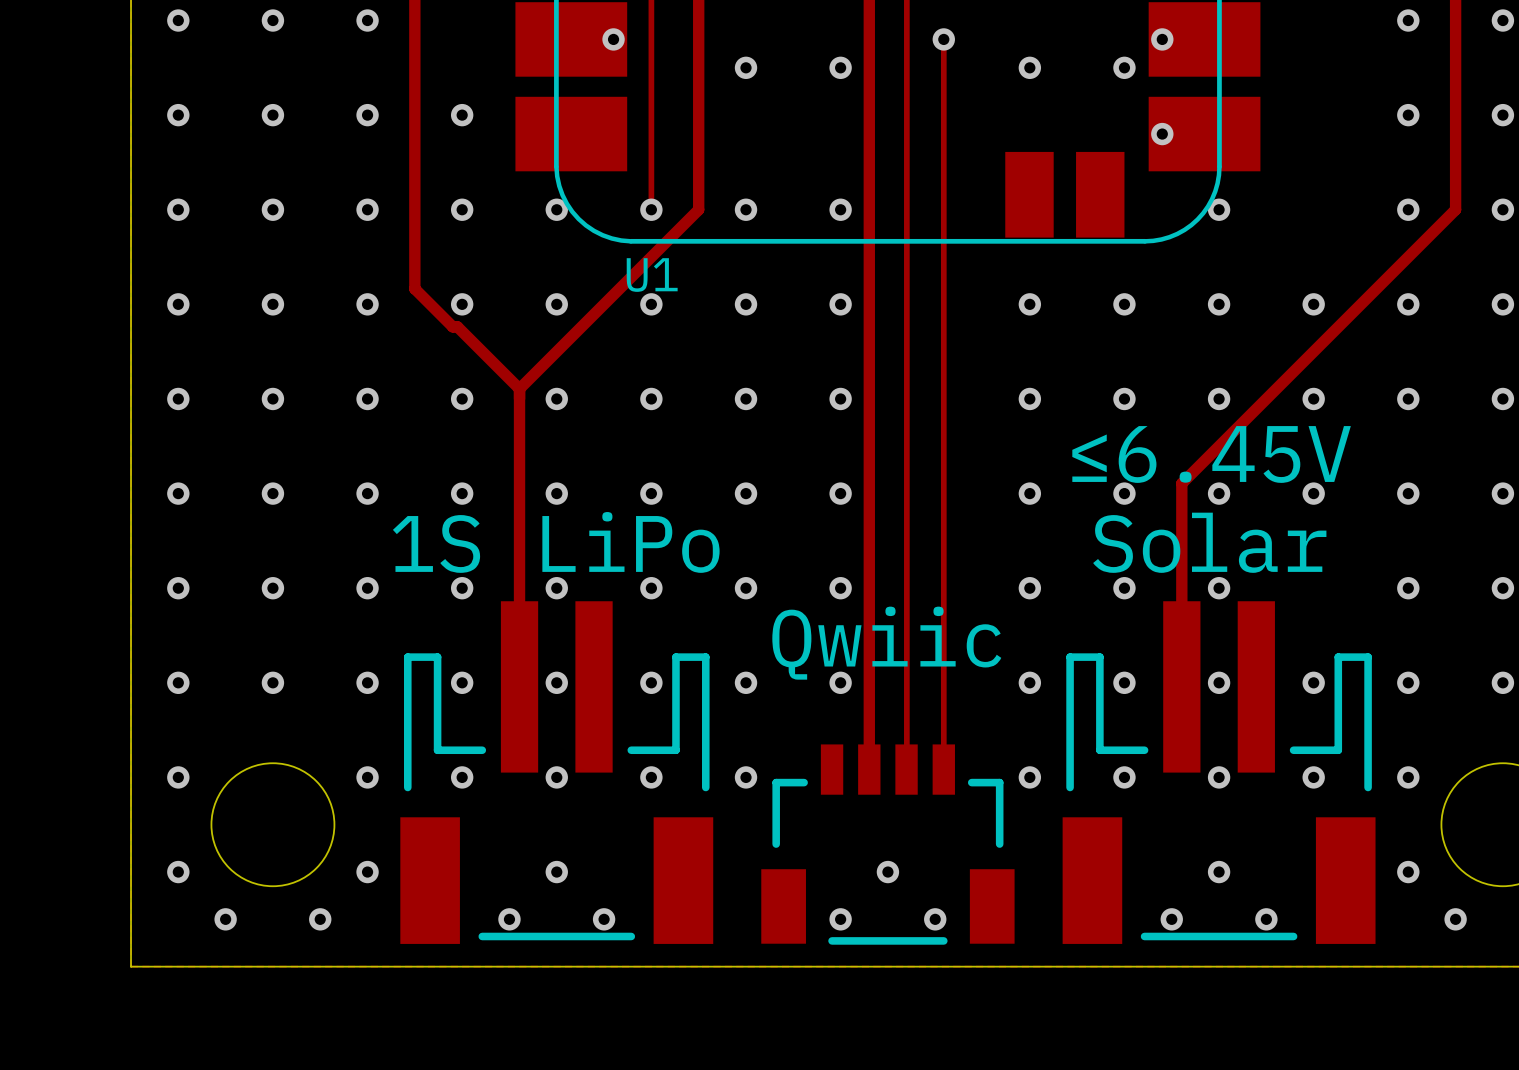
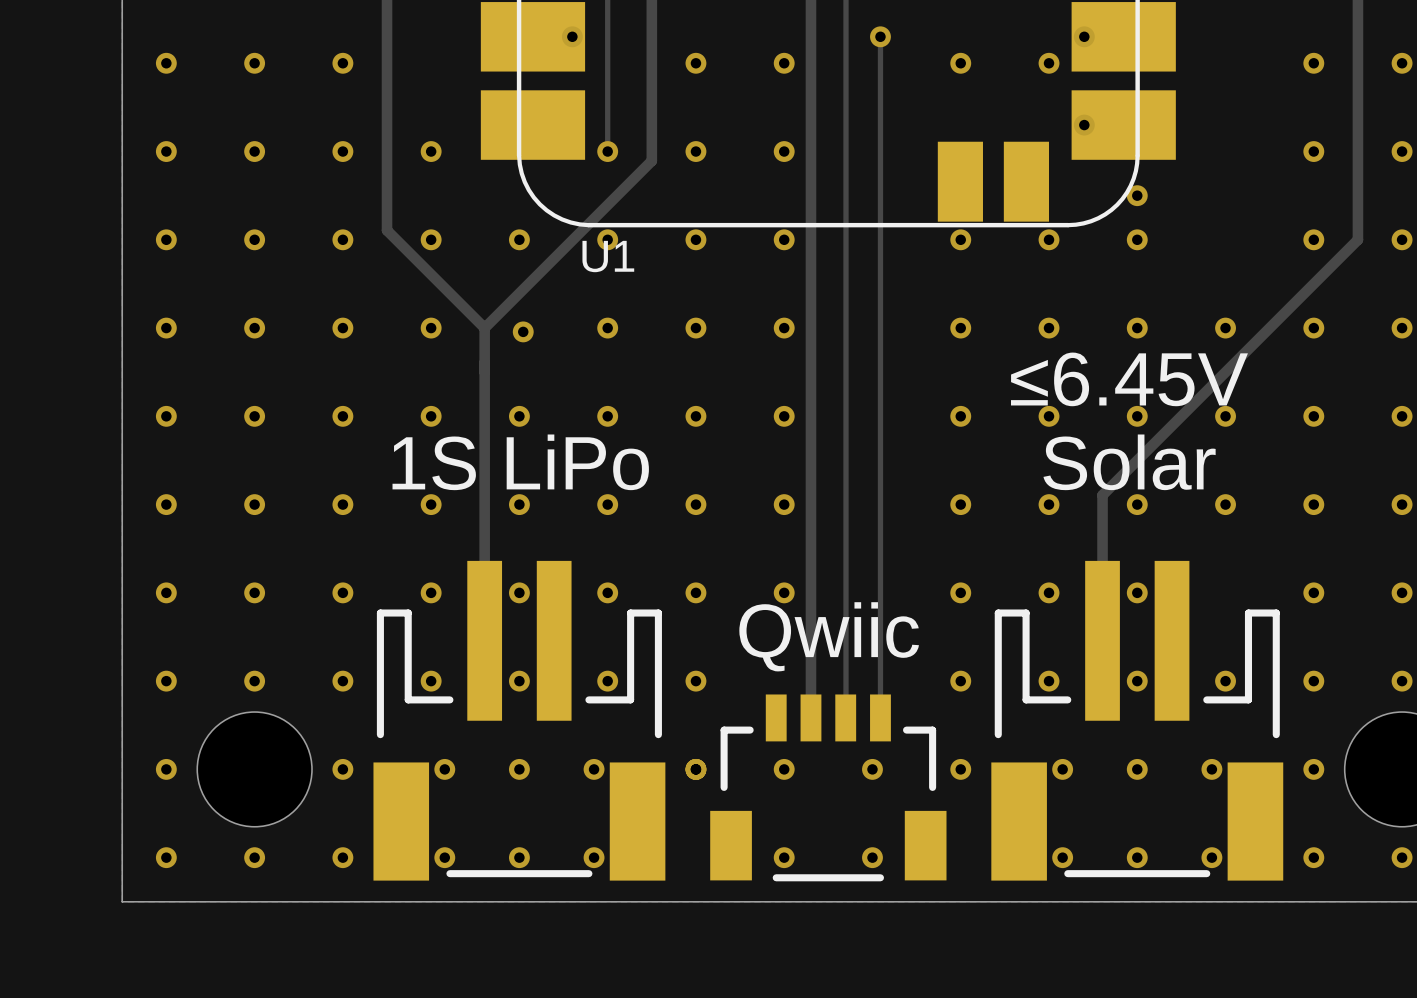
via: (178, 20) -> none
via: (272, 20) -> none
via: (367, 20) -> none
via: (1408, 20) -> none
via: (1502, 20) -> none
via: none -> (166, 63)
via: none -> (254, 63)
via: none -> (342, 63)
via: none -> (1313, 63)
via: none -> (1402, 63)
via: (178, 115) -> none
via: (272, 115) -> none
via: (367, 115) -> none
via: (462, 115) -> none
via: (1408, 115) -> none
via: (1502, 115) -> none
via: none -> (166, 151)
via: none -> (254, 151)
via: none -> (342, 151)
via: none -> (431, 151)
track: (651, 162) (651, 209) -> none
via: none -> (607, 151)
via: none -> (695, 151)
via: none -> (784, 151)
via: none -> (1313, 151)
via: none -> (1402, 151)
track: (698, 172) (698, 209) (519, 388) (457, 326) (452, 326) (414, 288) (414, 246) -> (651, 160) (484, 328)
via: (178, 209) -> none
via: (272, 209) -> none
via: (367, 209) -> none
via: (462, 209) -> none
via: (556, 209) -> none
via: (651, 209) -> none
via: (746, 209) -> none
via: (840, 209) -> none
via: (1408, 209) -> none
track: (1455, 209) (1181, 483) (1181, 530) -> (1357, 195) (1357, 239) (1102, 495)
via: (1502, 209) -> none
track: none -> (387, 230) (484, 328)
via: none -> (166, 239)
via: none -> (254, 239)
via: none -> (342, 239)
via: none -> (431, 239)
via: none -> (519, 239)
via: none -> (607, 239)
via: none -> (695, 239)
via: none -> (784, 239)
via: none -> (960, 239)
via: none -> (1049, 239)
via: none -> (1137, 239)
via: none -> (1313, 239)
via: none -> (1402, 239)
via: (178, 304) -> none
via: (272, 304) -> none
via: (367, 304) -> none
via: (462, 304) -> none
via: (556, 304) -> none
via: (651, 304) -> none
via: (746, 304) -> none
via: (840, 304) -> none
via: (1029, 304) -> none
via: (1124, 304) -> none
via: (1219, 304) -> none
via: (1313, 304) -> none
via: (1408, 304) -> none
via: (1502, 304) -> none
via: none -> (166, 328)
via: none -> (254, 328)
via: none -> (342, 328)
via: none -> (431, 328)
track: none -> (484, 328) (484, 362)
via: none -> (607, 328)
via: none -> (695, 328)
via: none -> (784, 328)
via: none -> (960, 328)
via: none -> (1049, 328)
via: none -> (1137, 328)
via: none -> (1225, 328)
via: none -> (1313, 328)
via: none -> (1402, 328)
via: none -> (523, 331)
via: (178, 398) -> none
via: (272, 398) -> none
via: (367, 398) -> none
via: (462, 398) -> none
via: (556, 398) -> none
via: (651, 398) -> none
via: (746, 398) -> none
via: (840, 398) -> none
via: (1029, 398) -> none
via: (1124, 398) -> none
via: (1219, 398) -> none
via: (1313, 398) -> none
via: (1408, 398) -> none
via: (1502, 398) -> none
via: none -> (166, 416)
via: none -> (254, 416)
via: none -> (342, 416)
via: none -> (431, 416)
via: none -> (519, 416)
via: none -> (607, 416)
via: none -> (695, 416)
via: none -> (784, 416)
via: none -> (960, 416)
via: none -> (1049, 416)
via: none -> (1137, 416)
via: none -> (1225, 416)
via: none -> (1313, 416)
via: none -> (1402, 416)
text position: ≤6.45V (1211, 454) -> ≤6.45V (1129, 379)
via: (178, 493) -> none
via: (272, 493) -> none
via: (367, 493) -> none
via: (462, 493) -> none
via: (556, 493) -> none
via: (651, 493) -> none
via: (746, 493) -> none
via: (840, 493) -> none
via: (1029, 493) -> none
via: (1124, 493) -> none
via: (1219, 493) -> none
via: (1313, 493) -> none
via: (1408, 493) -> none
via: (1502, 493) -> none
via: none -> (166, 504)
via: none -> (254, 504)
via: none -> (342, 504)
via: none -> (431, 504)
via: none -> (519, 504)
via: none -> (607, 504)
via: none -> (695, 504)
via: none -> (784, 504)
via: none -> (960, 504)
via: none -> (1049, 504)
via: none -> (1137, 504)
via: none -> (1225, 504)
via: none -> (1313, 504)
via: none -> (1402, 504)
text position: 1S LiPo (556, 542) -> 1S LiPo (520, 462)
text position: Solar (1209, 542) -> Solar (1129, 462)
via: (178, 588) -> none
via: (272, 588) -> none
via: (367, 588) -> none
via: (462, 588) -> none
via: (556, 588) -> none
via: (651, 588) -> none
via: (746, 588) -> none
via: (840, 588) -> none
via: (1029, 588) -> none
via: (1124, 588) -> none
via: (1219, 588) -> none
via: (1408, 588) -> none
via: (1502, 588) -> none
via: none -> (166, 592)
via: none -> (254, 592)
via: none -> (342, 592)
via: none -> (431, 592)
via: none -> (519, 592)
via: none -> (607, 592)
via: none -> (695, 592)
via: none -> (784, 592)
via: none -> (960, 592)
via: none -> (1049, 592)
via: none -> (1137, 592)
via: none -> (1313, 592)
via: none -> (1402, 592)
text position: Qwiic (886, 643) -> Qwiic (829, 636)
via: (178, 682) -> none
via: (272, 682) -> none
via: (367, 682) -> none
via: (462, 682) -> none
via: (556, 682) -> none
via: (651, 682) -> none
via: (746, 682) -> none
via: (840, 682) -> none
via: (1029, 682) -> none
via: (1124, 682) -> none
via: (1219, 682) -> none
via: (1313, 682) -> none
via: (1408, 682) -> none
via: (1502, 682) -> none
via: none -> (166, 681)
via: none -> (254, 681)
via: none -> (342, 681)
via: none -> (431, 681)
via: none -> (519, 681)
via: none -> (607, 681)
via: none -> (695, 681)
via: none -> (960, 681)
via: none -> (1049, 681)
via: none -> (1137, 681)
via: none -> (1225, 681)
via: none -> (1313, 681)
via: none -> (1402, 681)
via: (178, 777) -> none
via: (367, 777) -> none
via: (462, 777) -> none
via: (556, 777) -> none
via: (651, 777) -> none
via: (746, 777) -> none
via: (1029, 777) -> none
via: (1124, 777) -> none
via: (1219, 777) -> none
via: (1313, 777) -> none
via: (1408, 777) -> none
via: none -> (166, 769)
via: none -> (342, 769)
via: none -> (444, 769)
via: none -> (519, 769)
via: none -> (594, 769)
via: none -> (695, 769)
via: none -> (784, 769)
via: none -> (872, 769)
via: none -> (960, 769)
via: none -> (1062, 769)
via: none -> (1137, 769)
via: none -> (1211, 769)
via: none -> (1313, 769)
via: (178, 872) -> none
via: (367, 872) -> none
via: (556, 872) -> none
via: (887, 872) -> none
via: (1219, 872) -> none
via: (1408, 872) -> none
via: none -> (166, 857)
via: (225, 919) -> none
via: none -> (254, 857)
via: (320, 919) -> none
via: none -> (342, 857)
via: none -> (444, 857)
via: (509, 919) -> none
via: none -> (519, 857)
via: (604, 919) -> none
via: none -> (594, 857)
via: none -> (1062, 857)
via: (1171, 919) -> none
via: none -> (1137, 857)
via: (1266, 919) -> none
via: none -> (1211, 857)
via: none -> (1313, 857)
via: (1455, 919) -> none
via: none -> (1402, 857)

